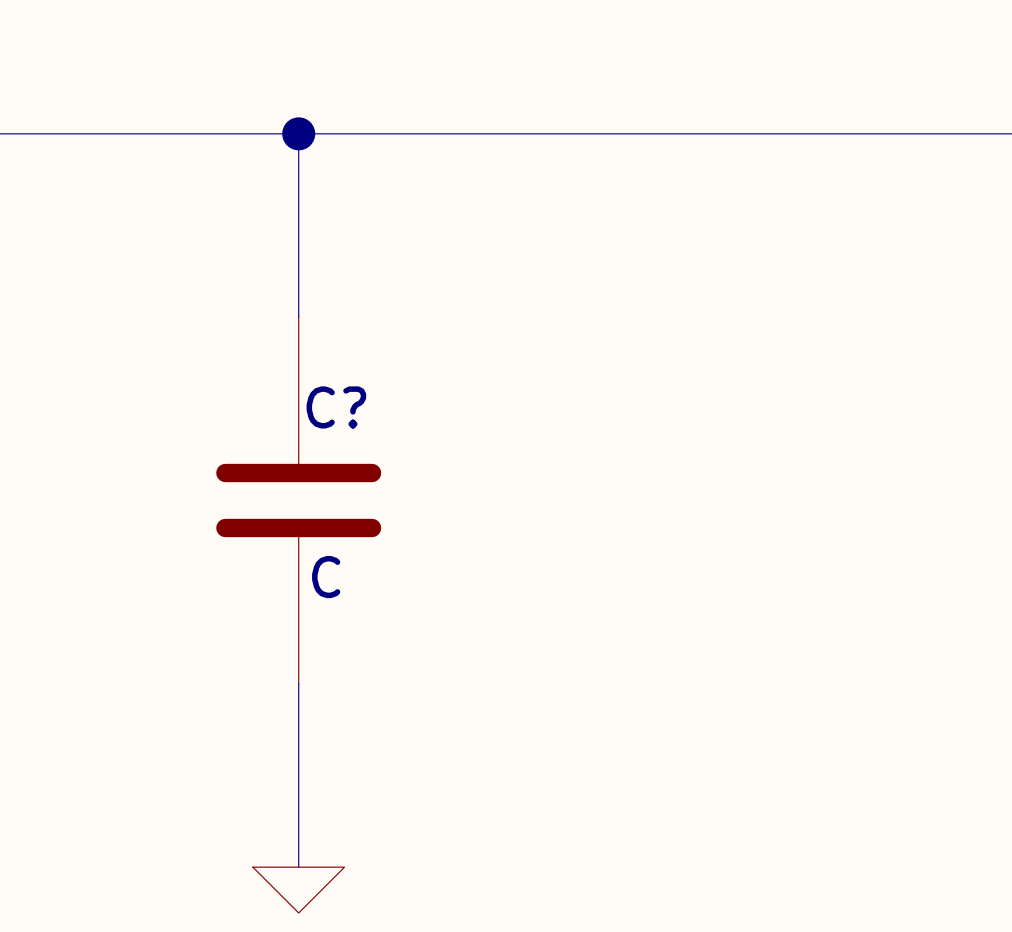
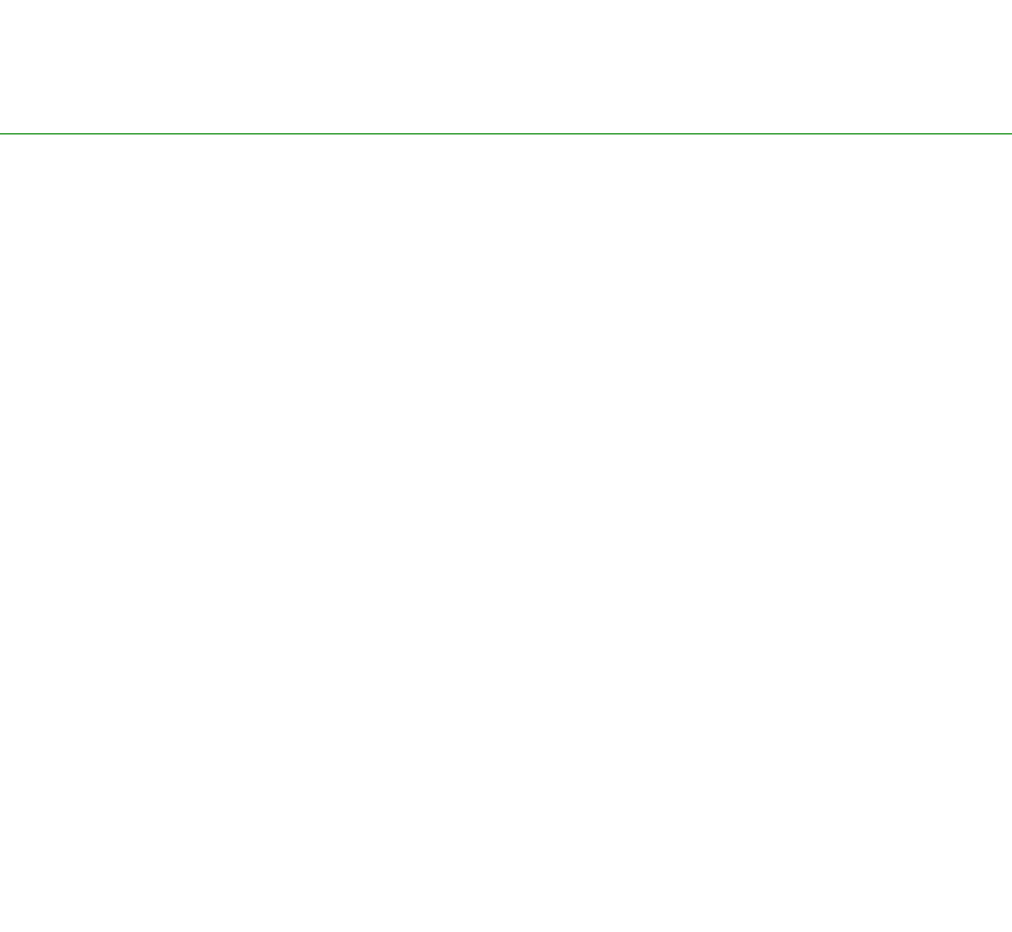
wire: (298, 133) (298, 317) -> none
junction: (298, 133) -> none
C?: C (298, 500) -> none
wire: (298, 683) (298, 867) -> none
power symbol: (298, 890) -> none

